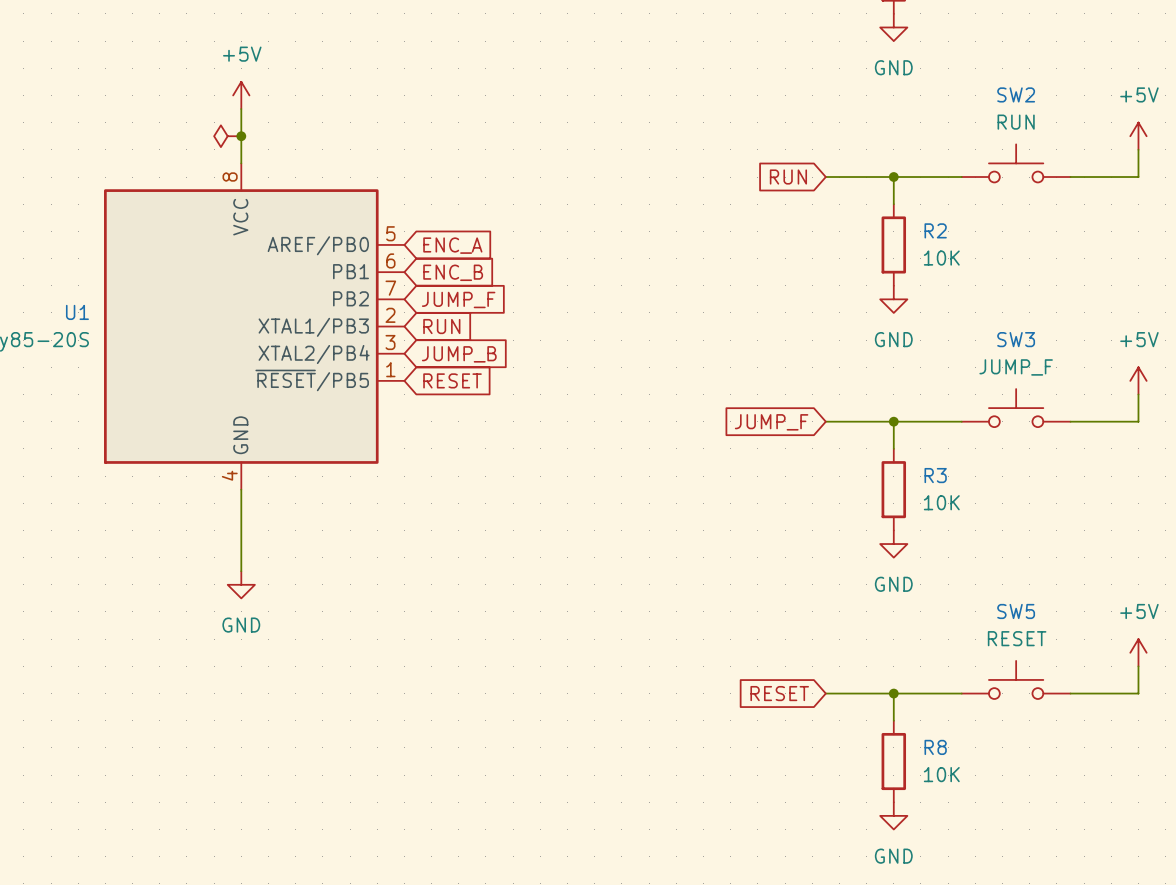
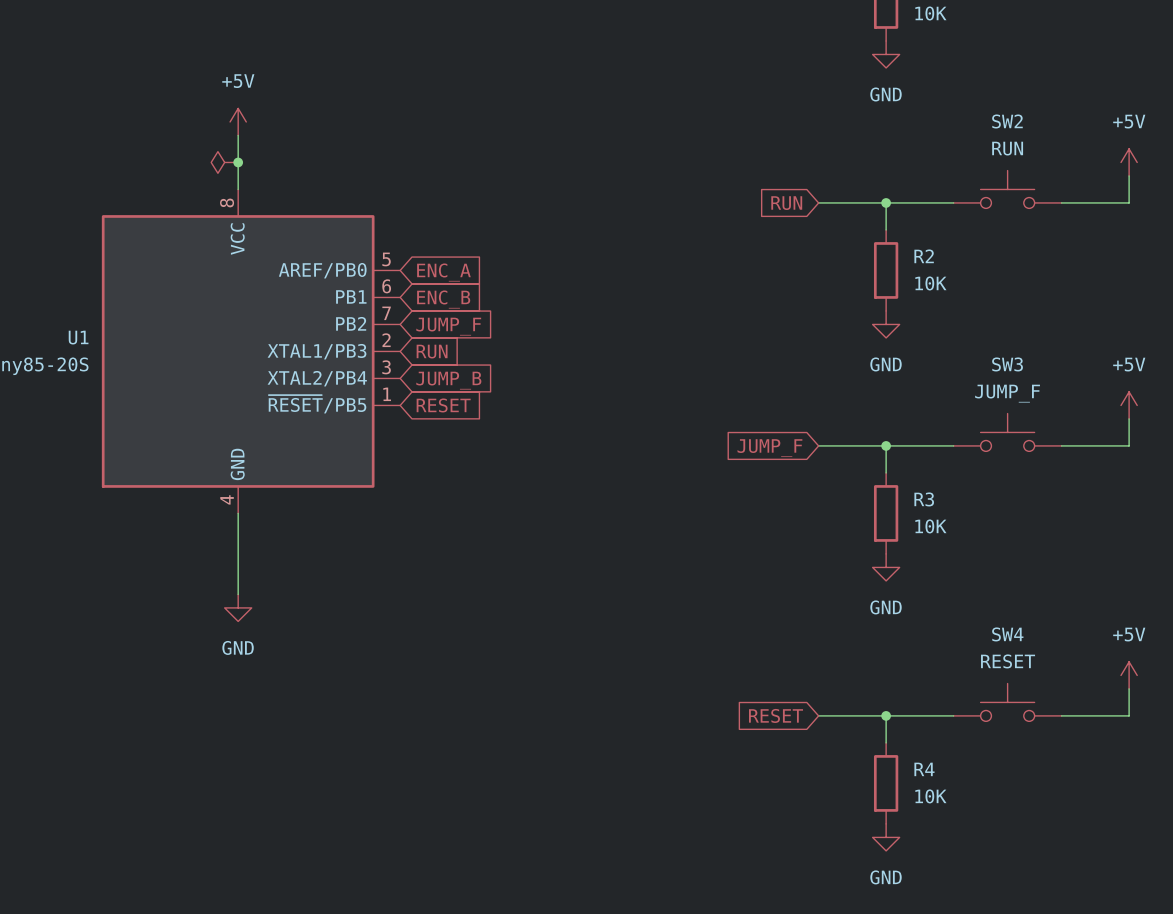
SW5 name: SW5 (1016, 611) -> SW4 (1007, 634)
R8 name: R8 (935, 747) -> R4 (924, 769)

